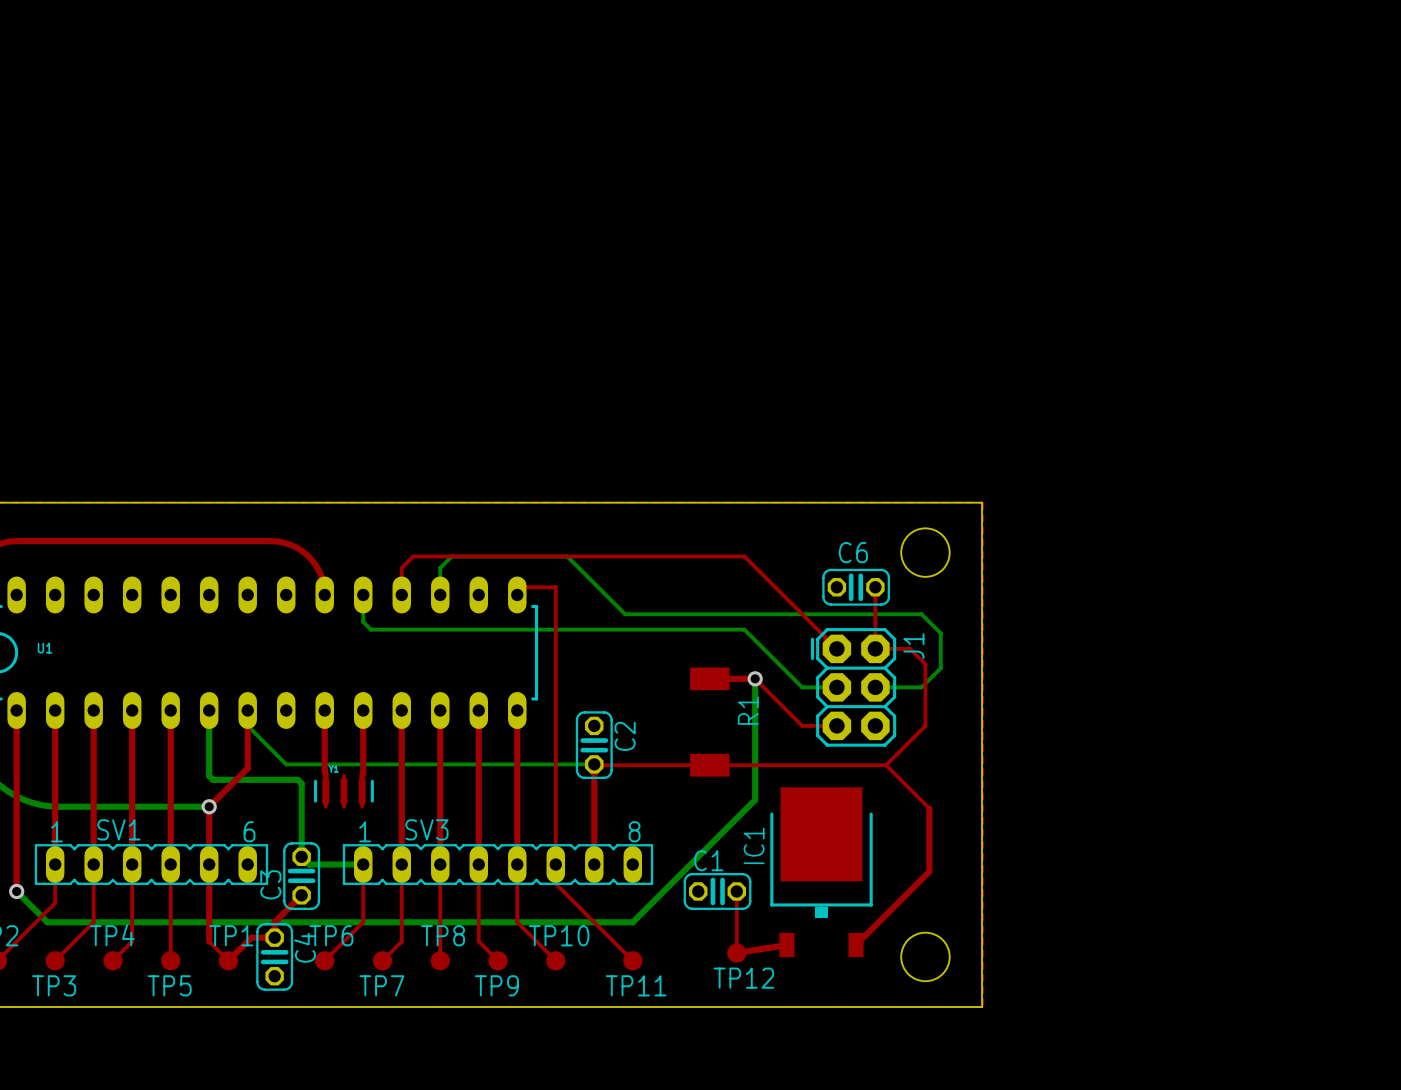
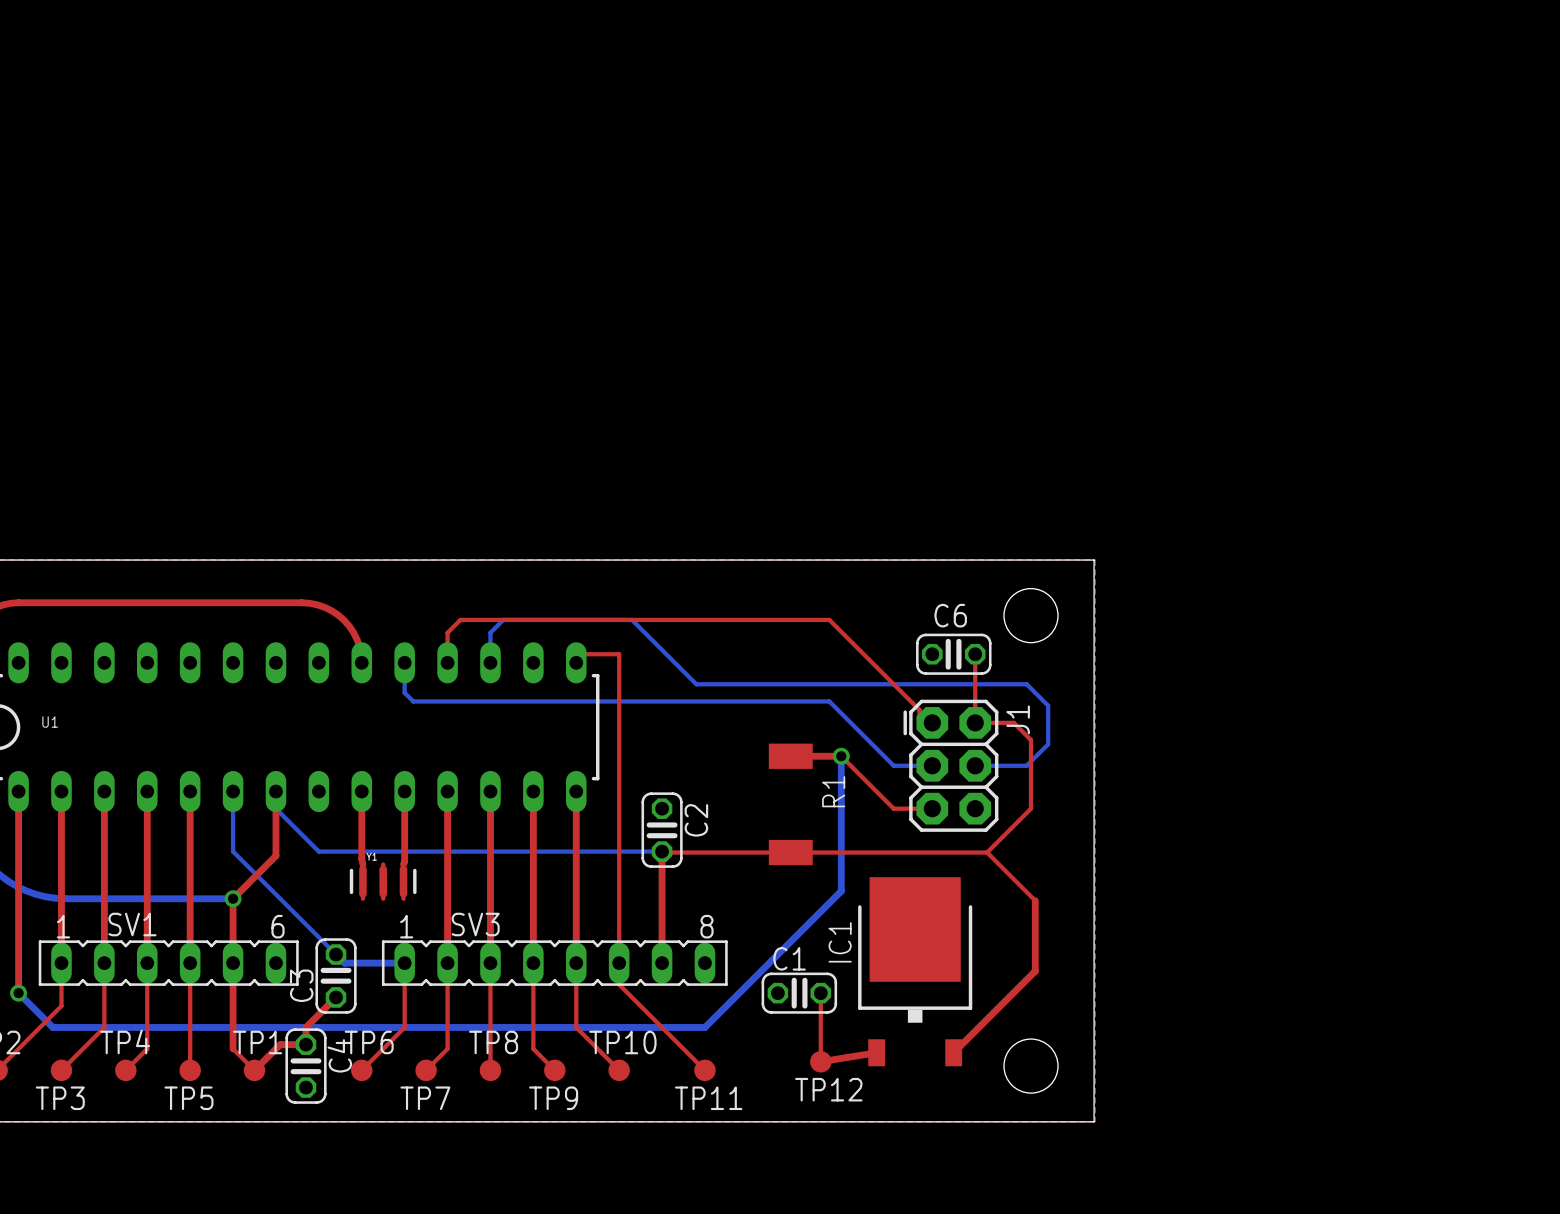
bottom track: (209, 710) (209, 775) (213, 779) (297, 779) (301, 783) (301, 856) -> (233, 851) (336, 954)

